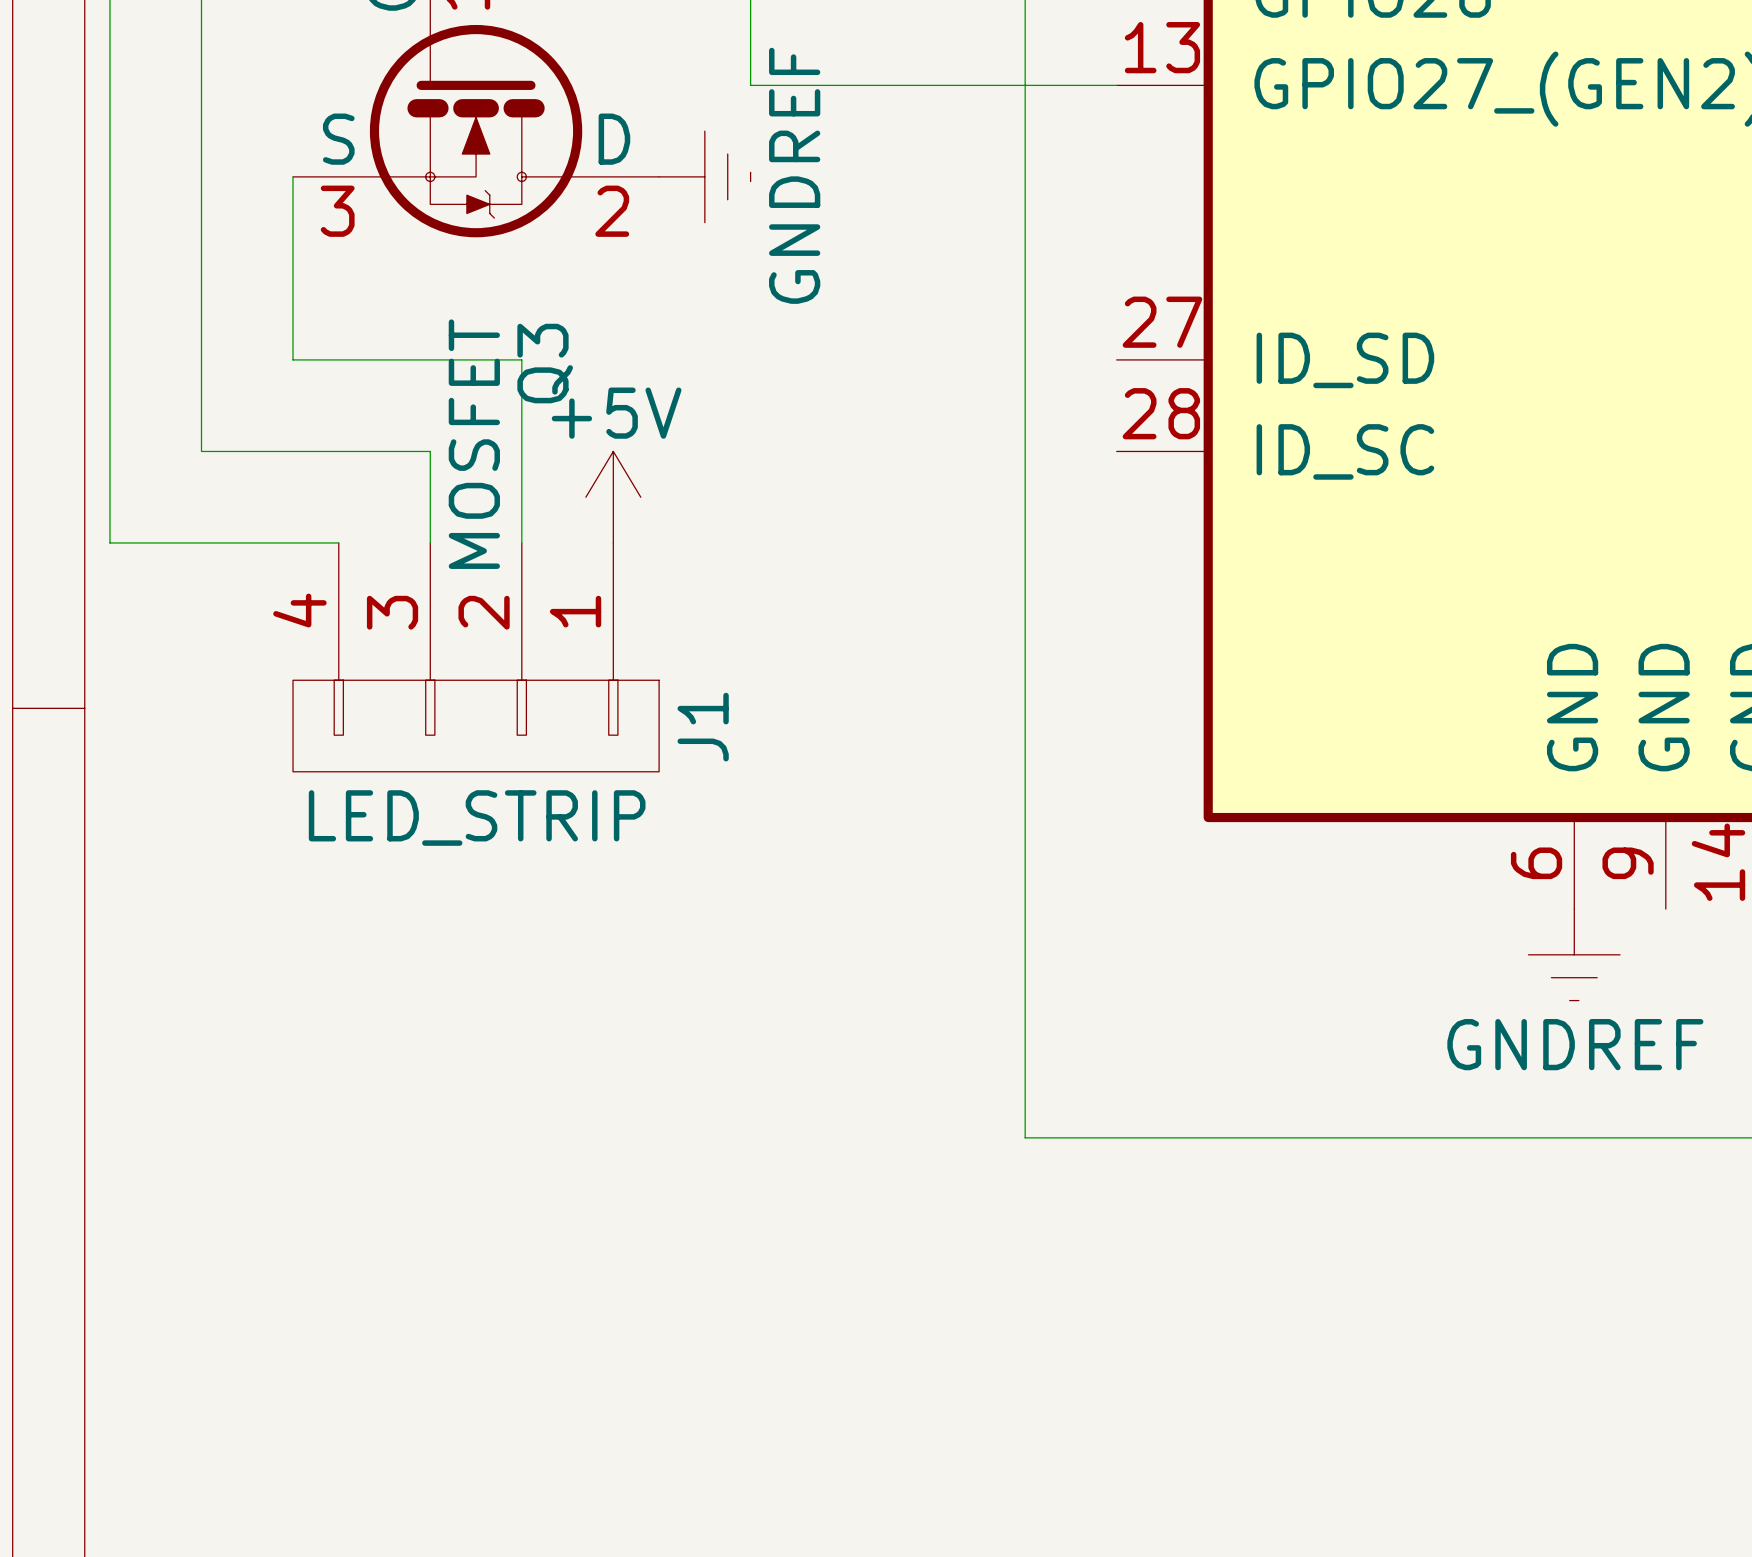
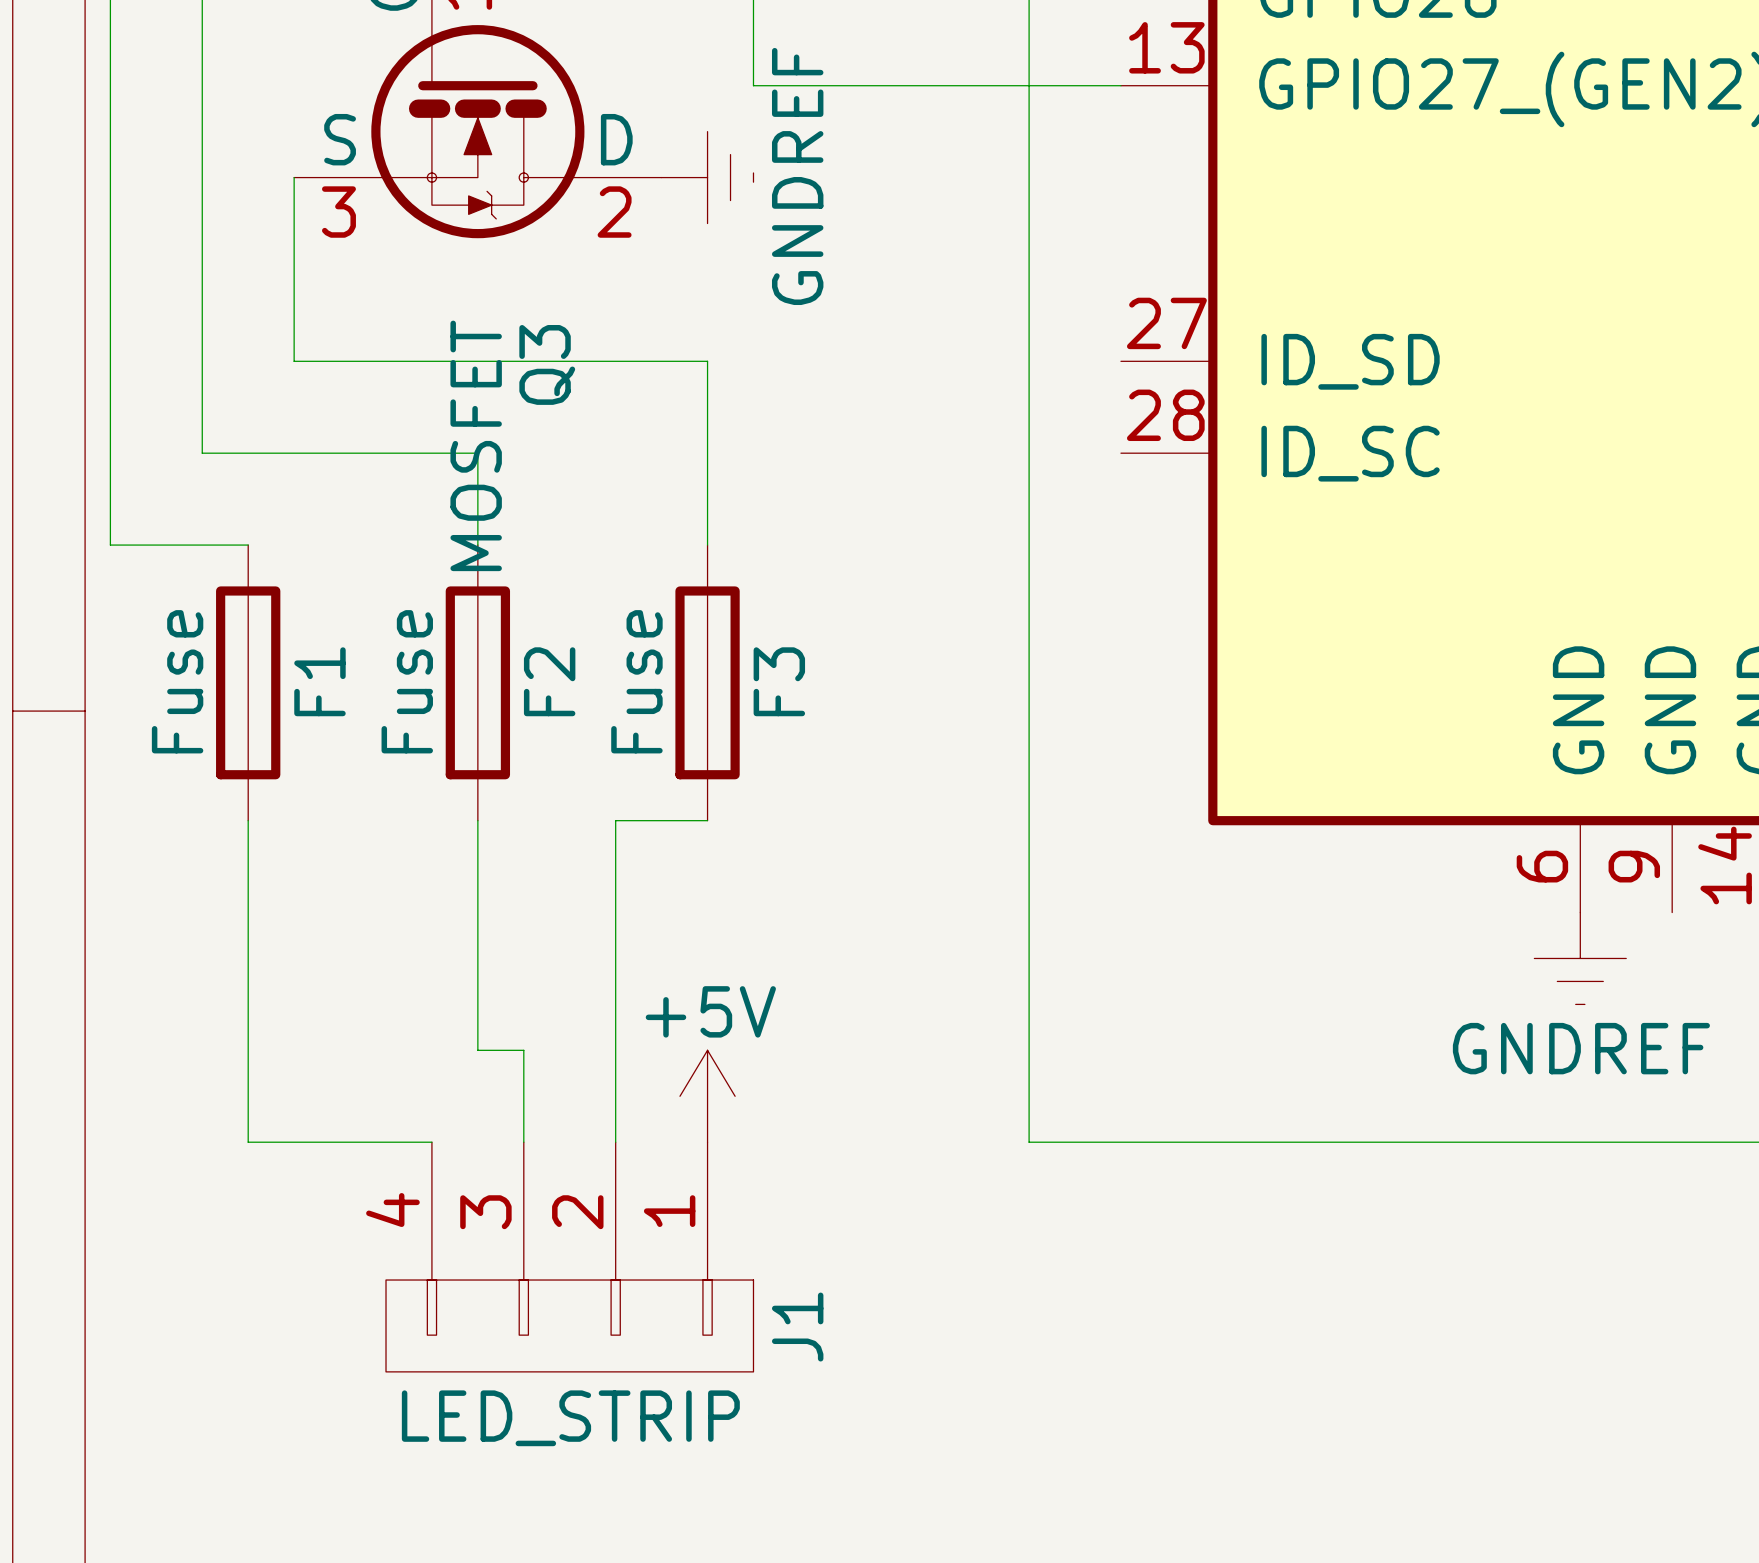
wire: (521, 359) (521, 542) -> (523, 361) (707, 361) (707, 545)
wire: (430, 451) (430, 542) -> (431, 453) (477, 453) (477, 545)
power symbol position: +5V (613, 497) -> +5V (707, 1096)
wire: (247, 542) (338, 542) -> none
J1 position: (476, 657) -> (569, 1257)
F1: none -> Fuse (248, 682)
F2: none -> Fuse (477, 682)
F3: none -> Fuse (707, 682)
wire: none -> (248, 820) (248, 1142) (431, 1142)
wire: none -> (477, 820) (477, 1050) (523, 1050) (523, 1142)
wire: none -> (707, 820) (615, 820) (615, 1142)

